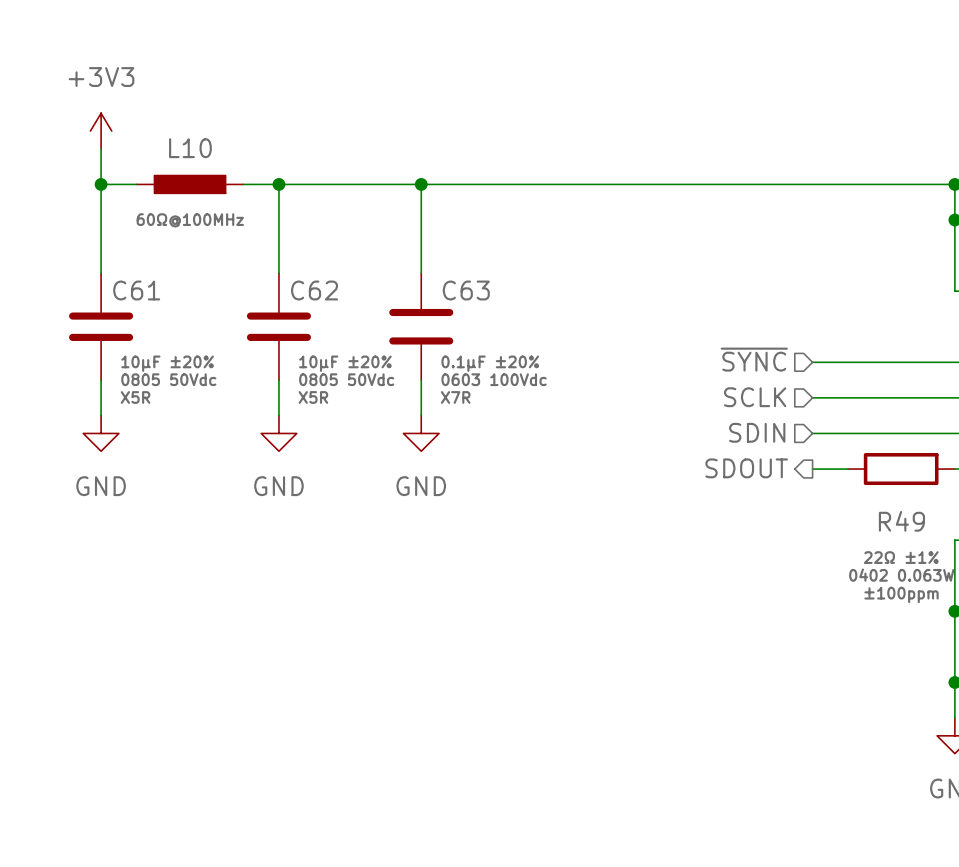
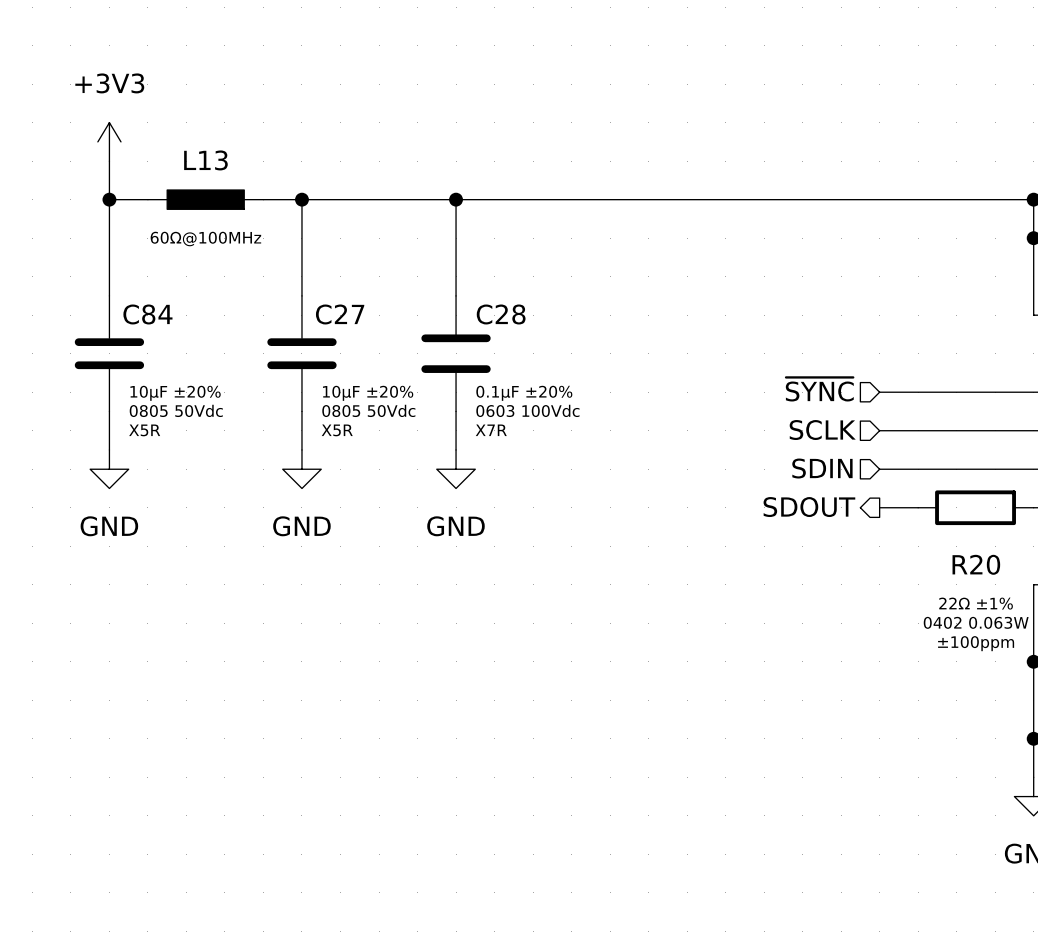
L10 name: L10 (190, 148) -> L13 (205, 160)
C61 name: C61 (136, 290) -> C84 (147, 314)
C62 name: C62 (314, 290) -> C27 (340, 314)
C63 name: C63 (466, 290) -> C28 (501, 314)
R49 name: R49 (901, 521) -> R20 (976, 564)

